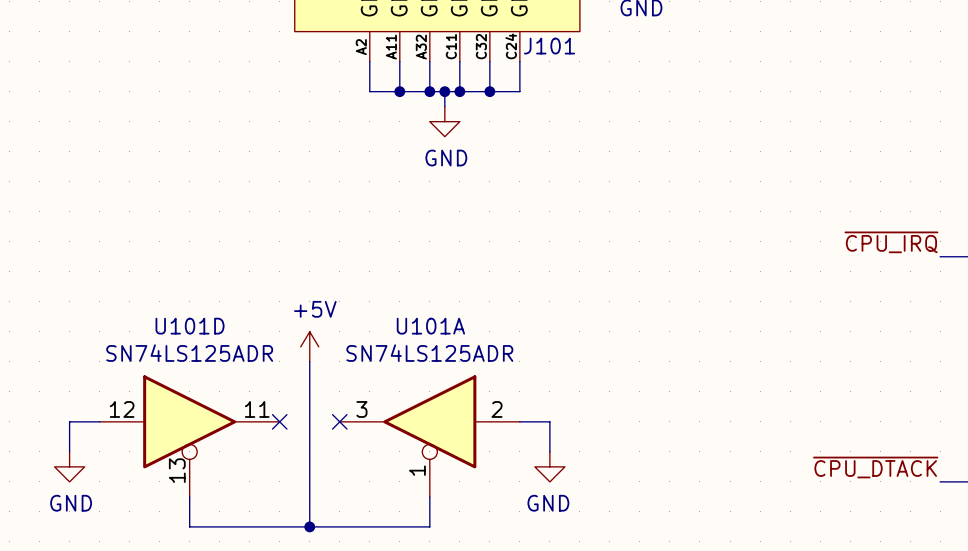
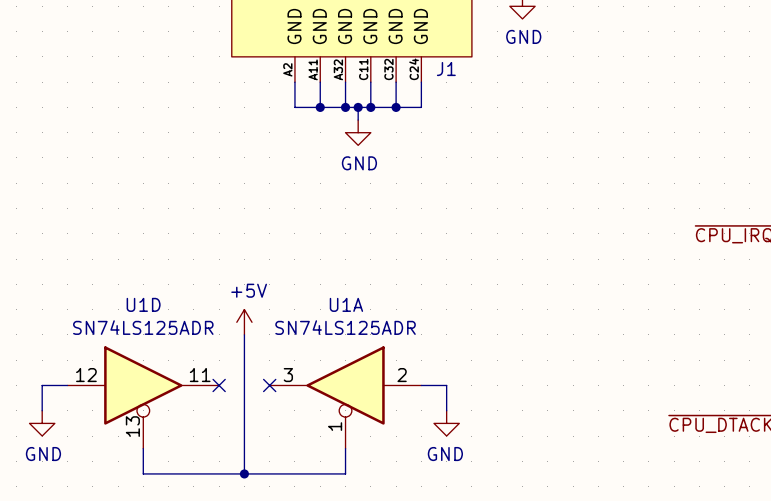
J101 name: J101 (549, 46) -> J1 (446, 69)
U101D name: U101D (190, 326) -> U1D (143, 304)
U101A name: U101A (430, 326) -> U1A (346, 304)

